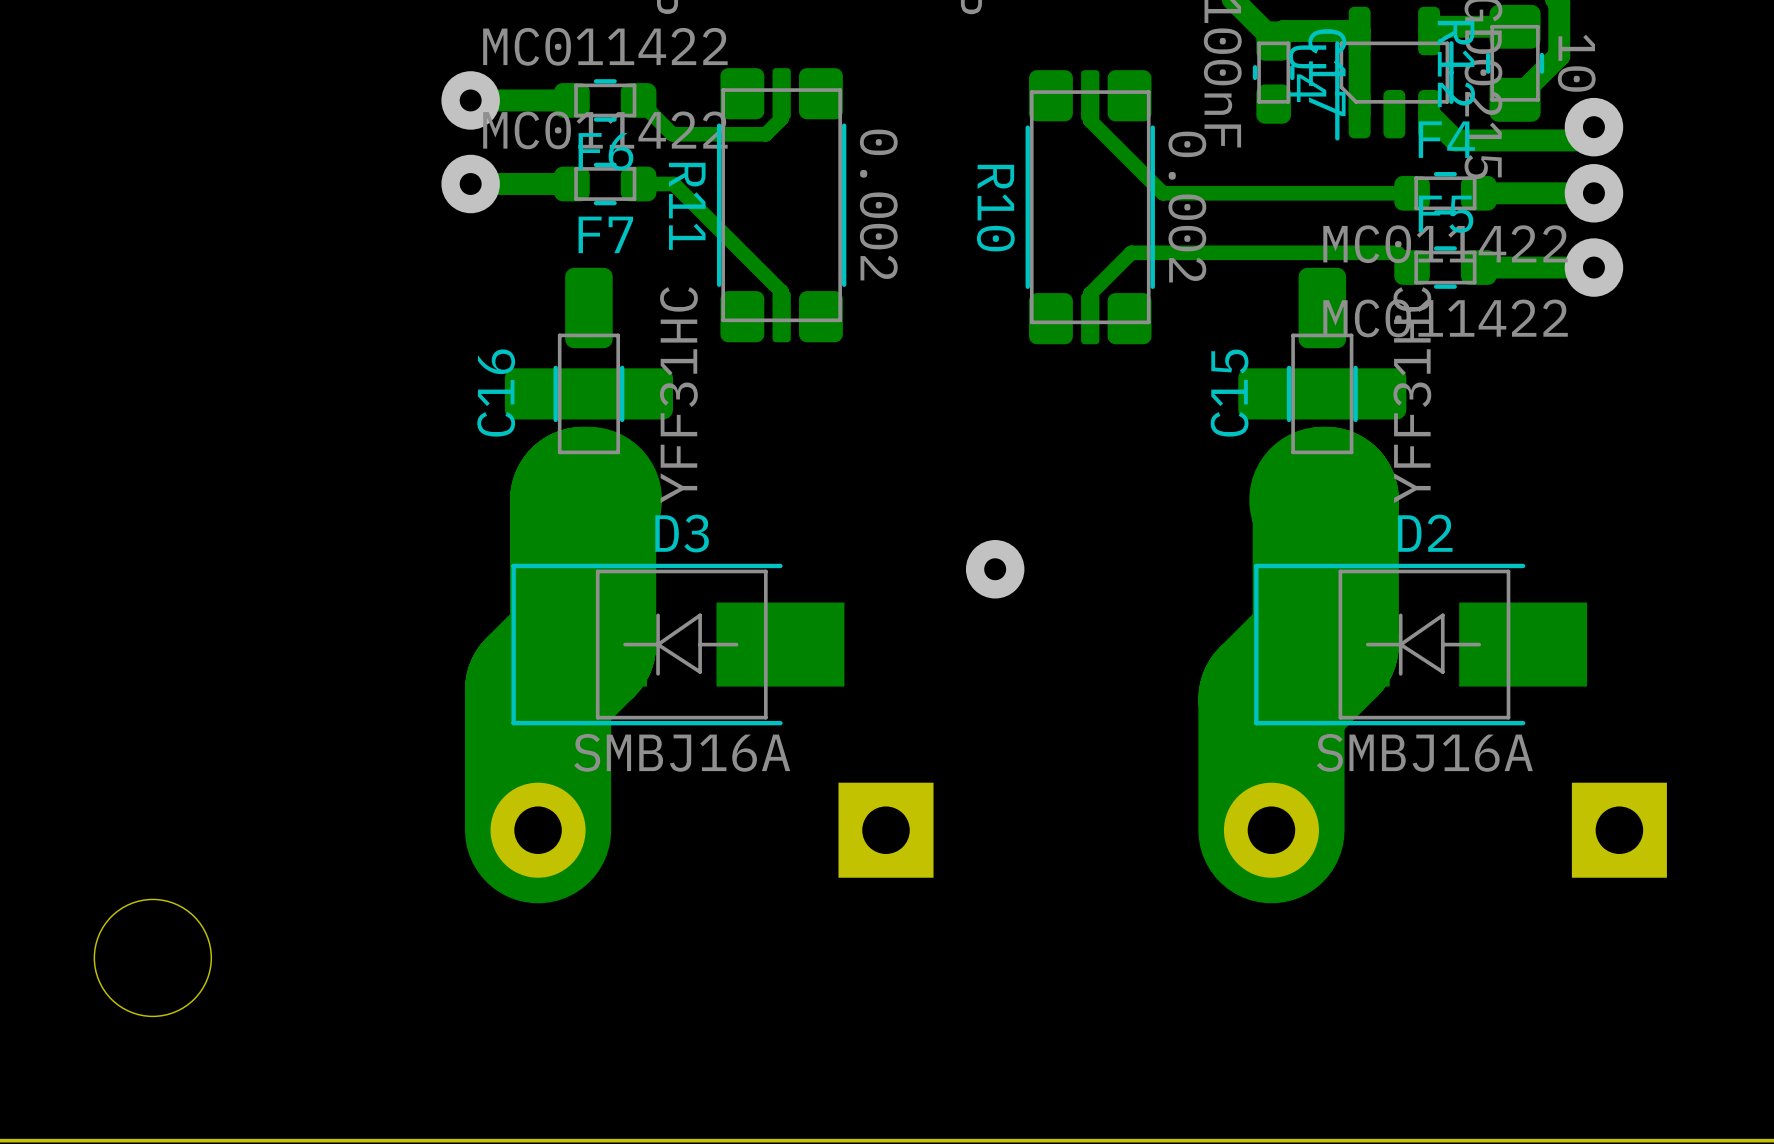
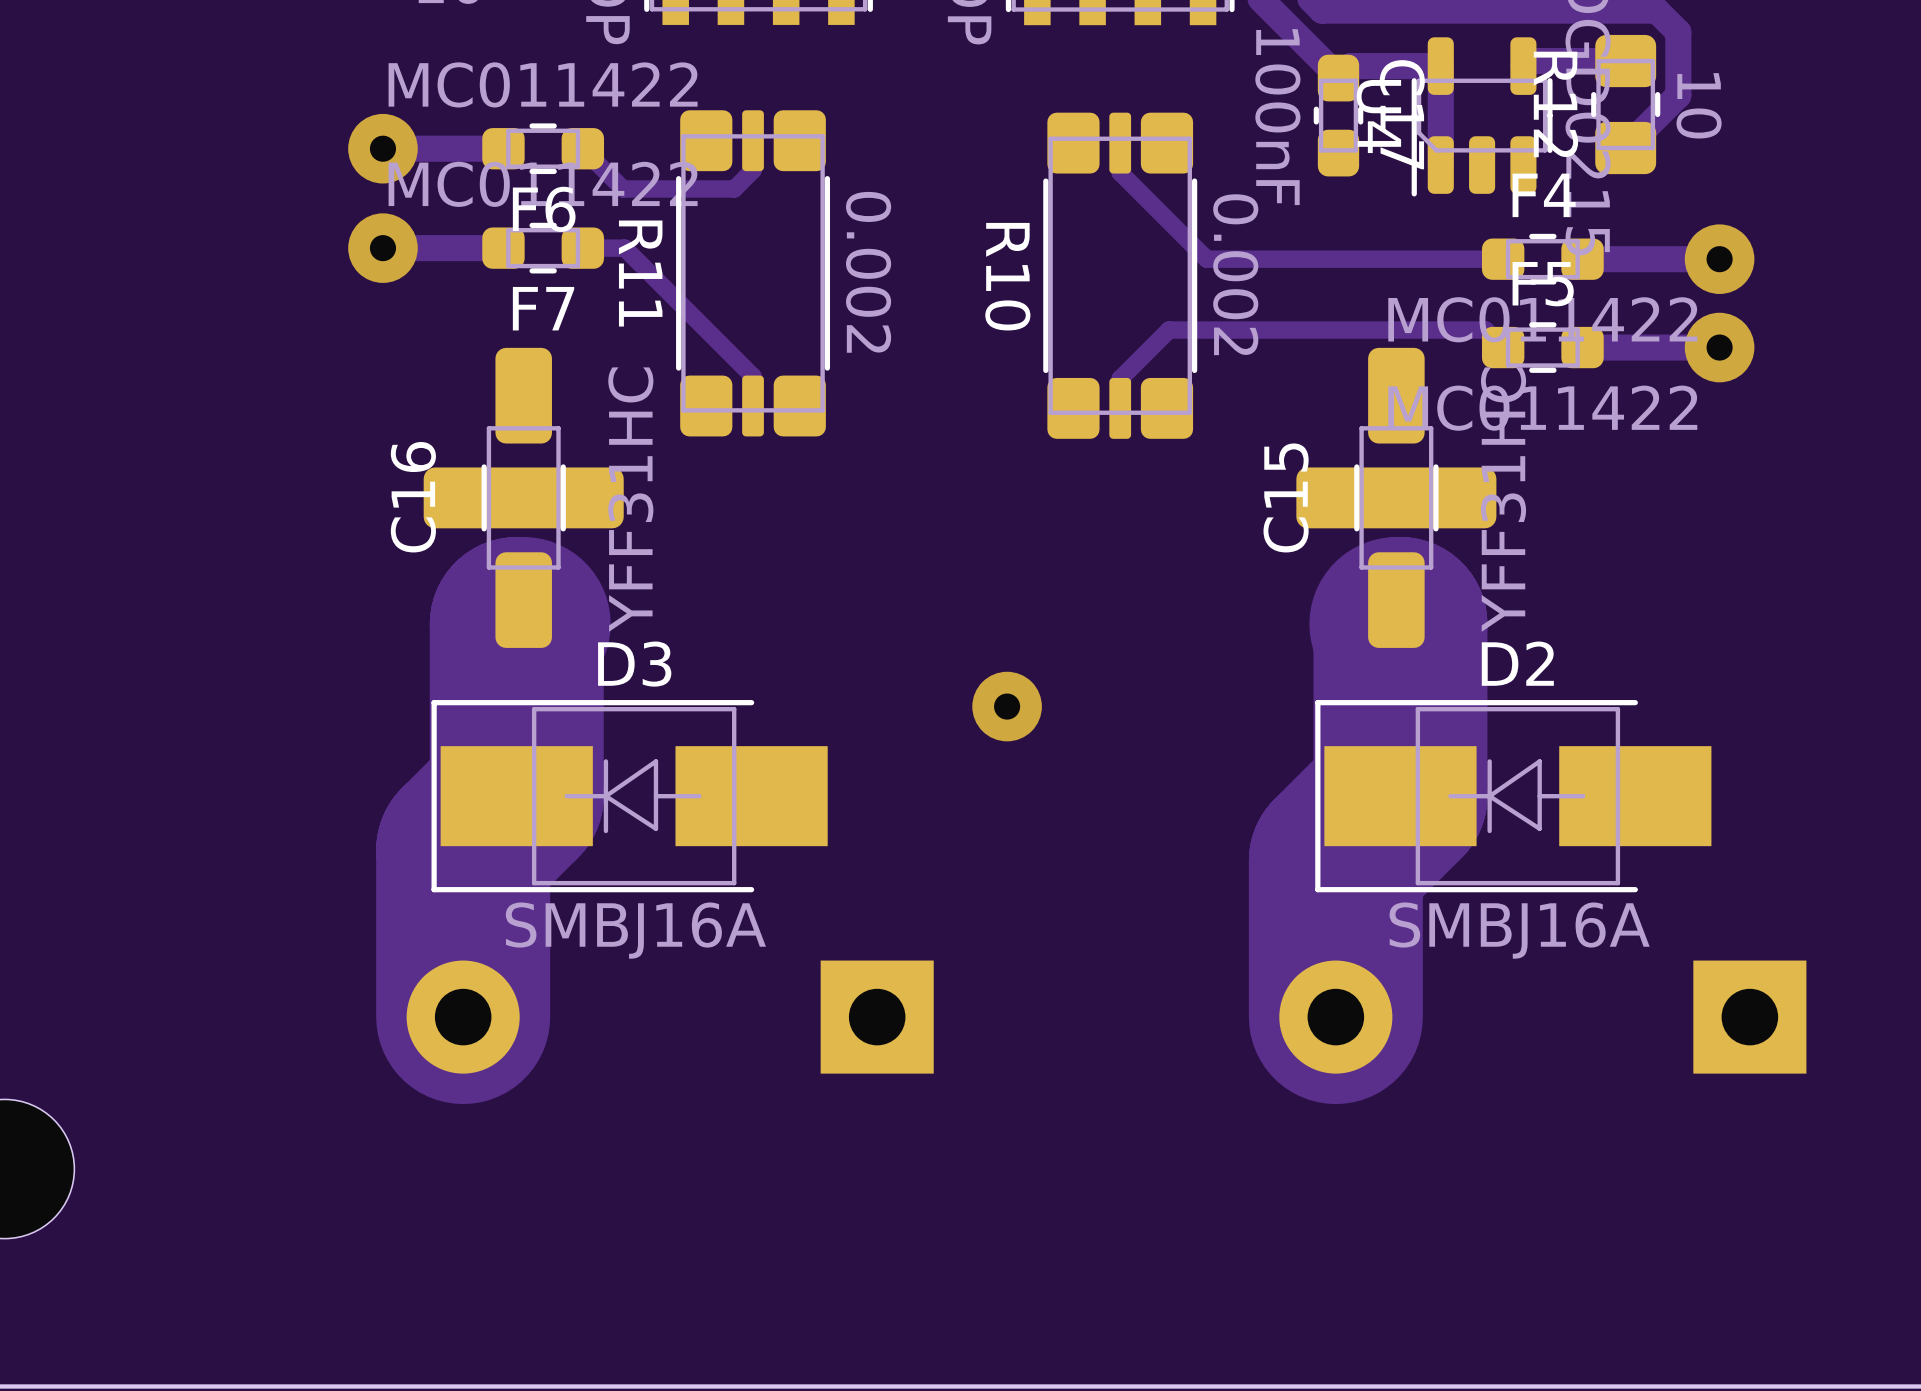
track: (1429, 114) (1455, 140) (1580, 140) (1593, 127) -> none
via: (1593, 127) -> none

